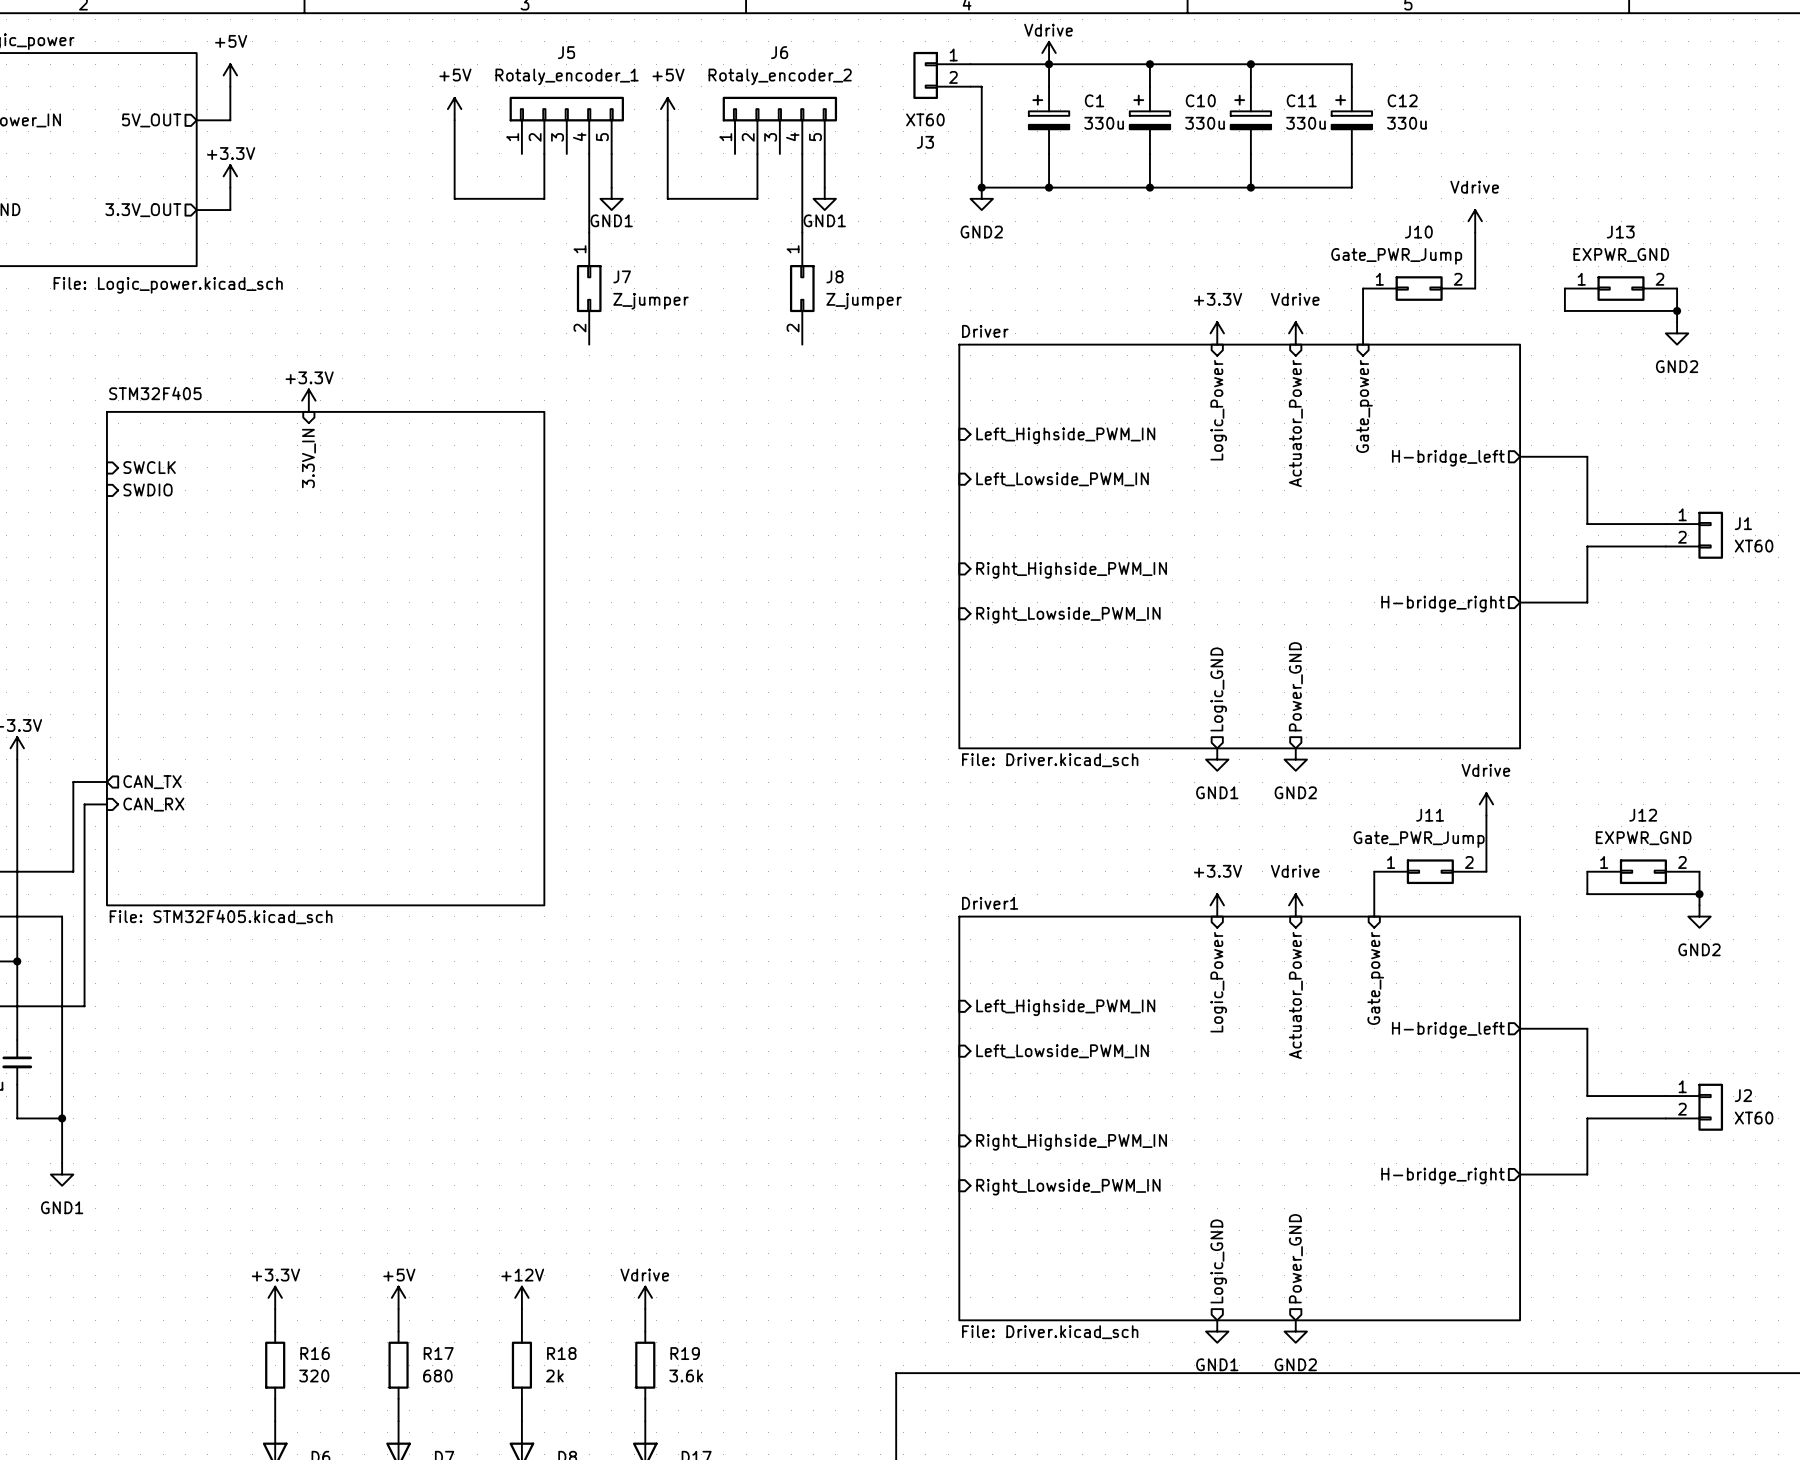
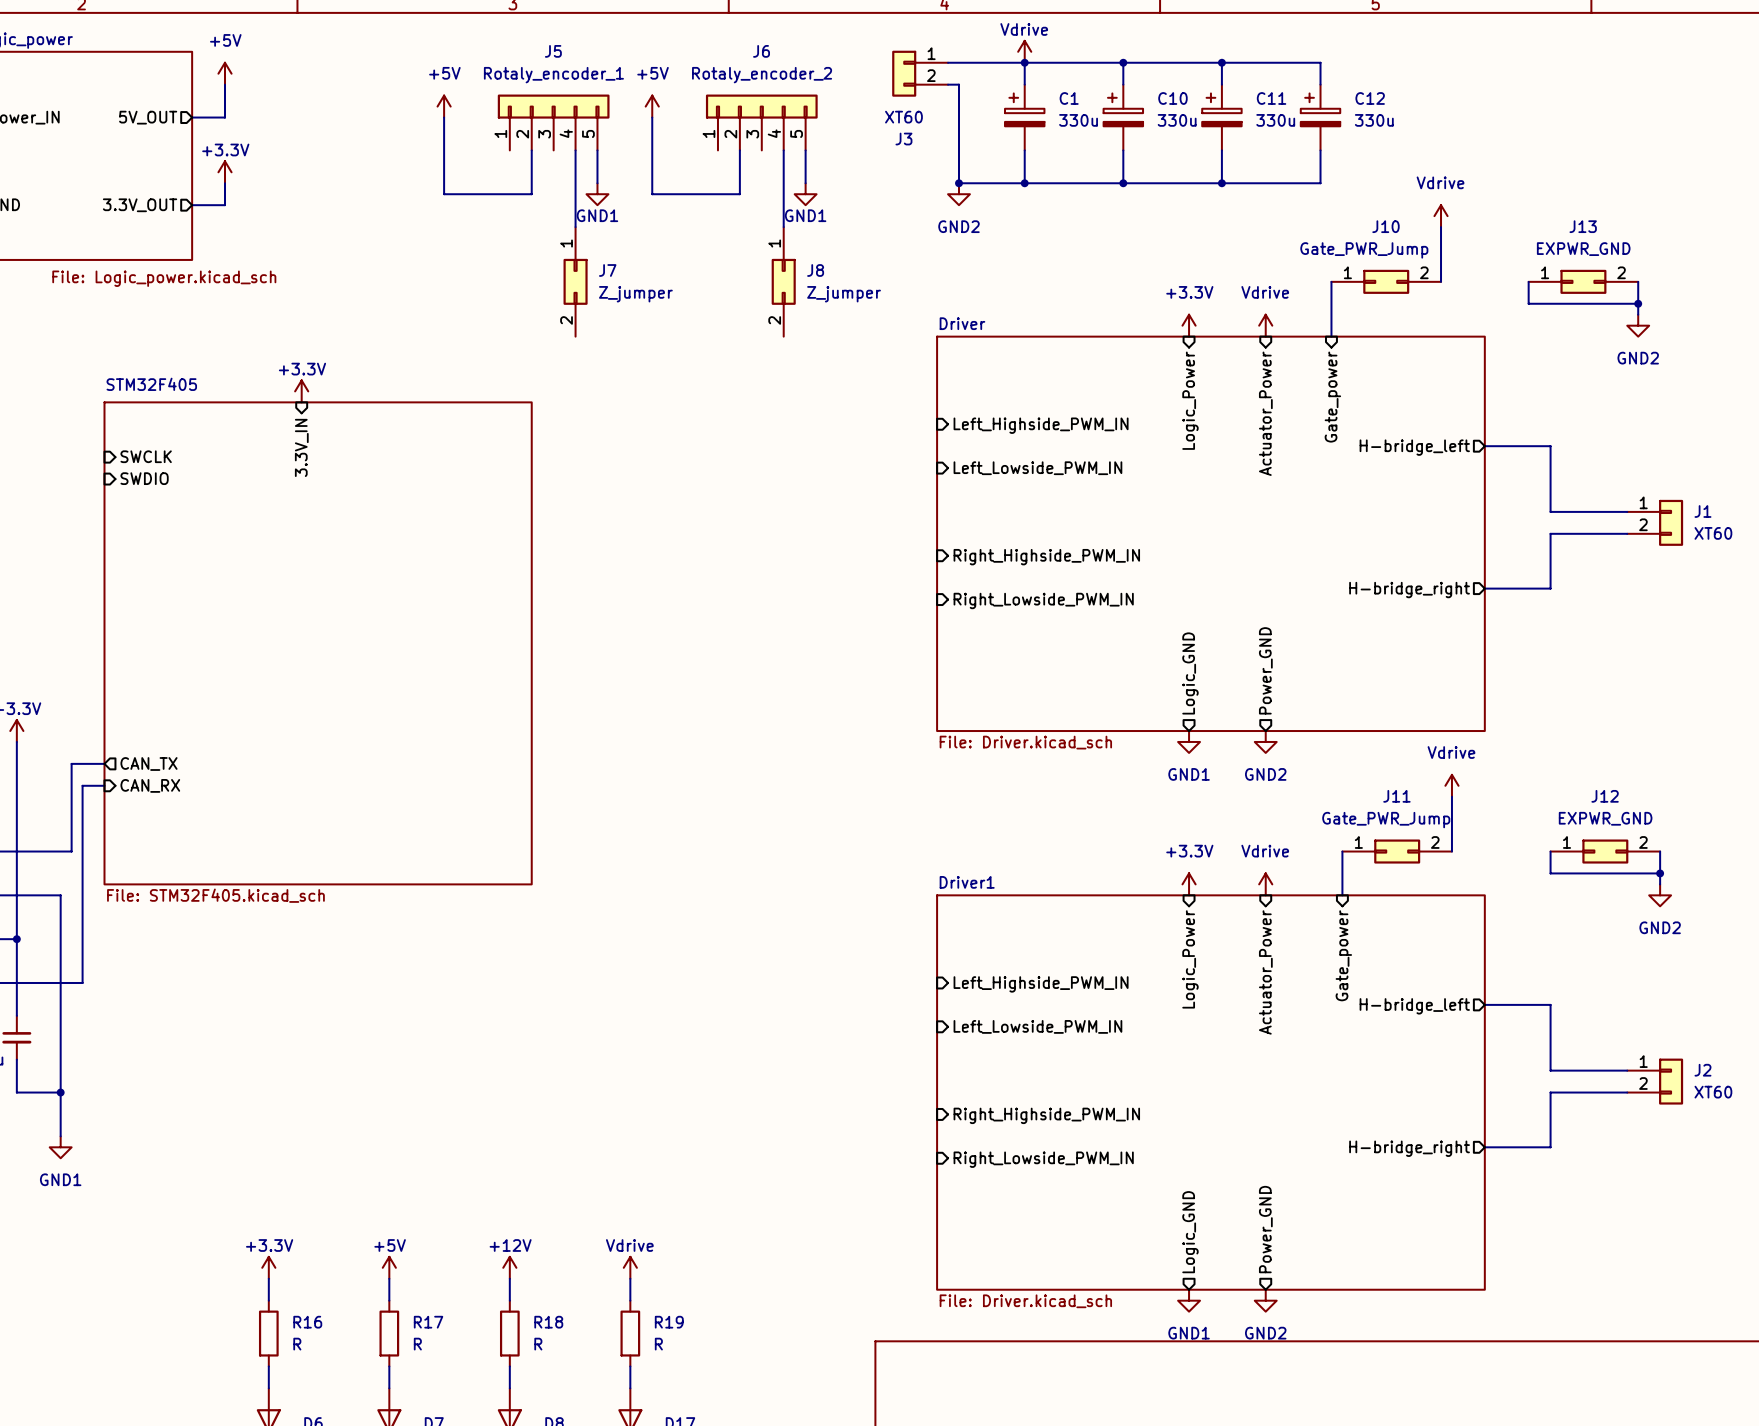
R16 value: 320 (314, 1375) -> R (297, 1344)
R17 value: 680 (437, 1375) -> R (417, 1344)
R18 value: 2k (554, 1375) -> R (538, 1344)
R19 value: 3.6k (686, 1375) -> R (658, 1344)

